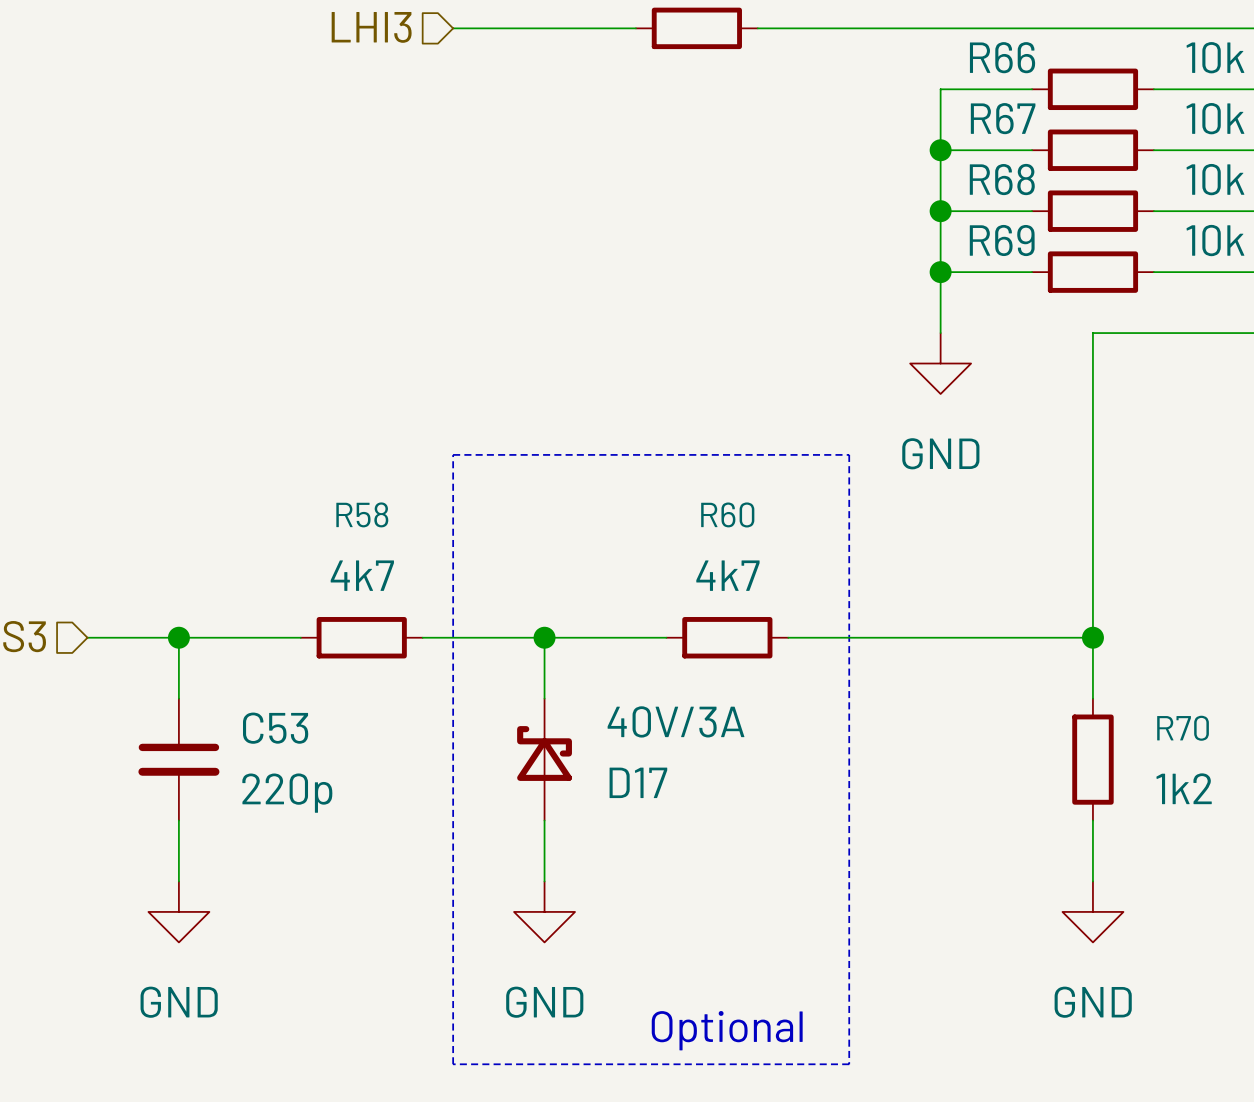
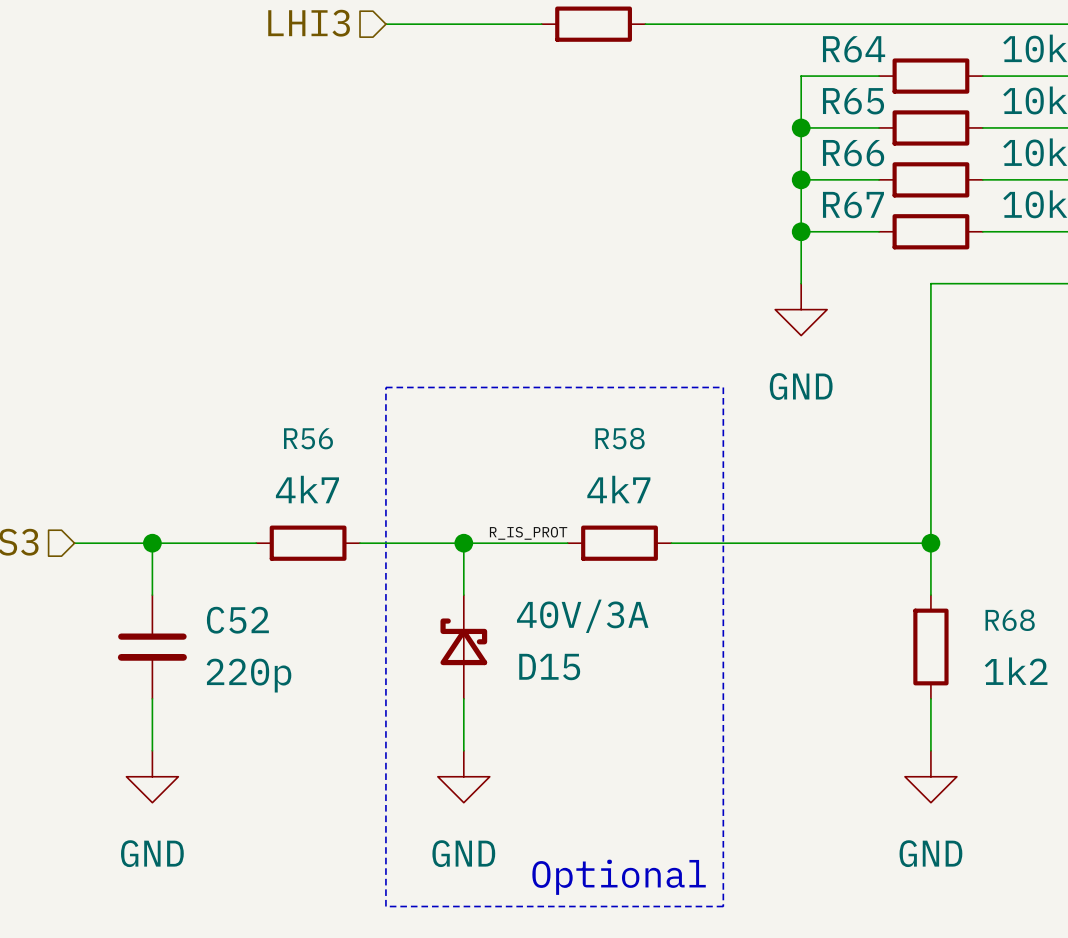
R66 name: R66 (1002, 57) -> R64 (854, 49)
R67 name: R67 (1003, 118) -> R65 (853, 101)
R68 name: R68 (1002, 179) -> R66 (853, 153)
R69 name: R69 (1002, 240) -> R67 (853, 205)
R58 name: R58 (362, 514) -> R56 (308, 438)
R60 name: R60 (727, 514) -> R58 (620, 438)
label: none -> R_IS_PROT (528, 533)
C53 name: C53 (275, 728) -> C52 (237, 620)
R70 name: R70 (1183, 728) -> R68 (1010, 620)
D17 name: D17 (638, 782) -> D15 (549, 667)

